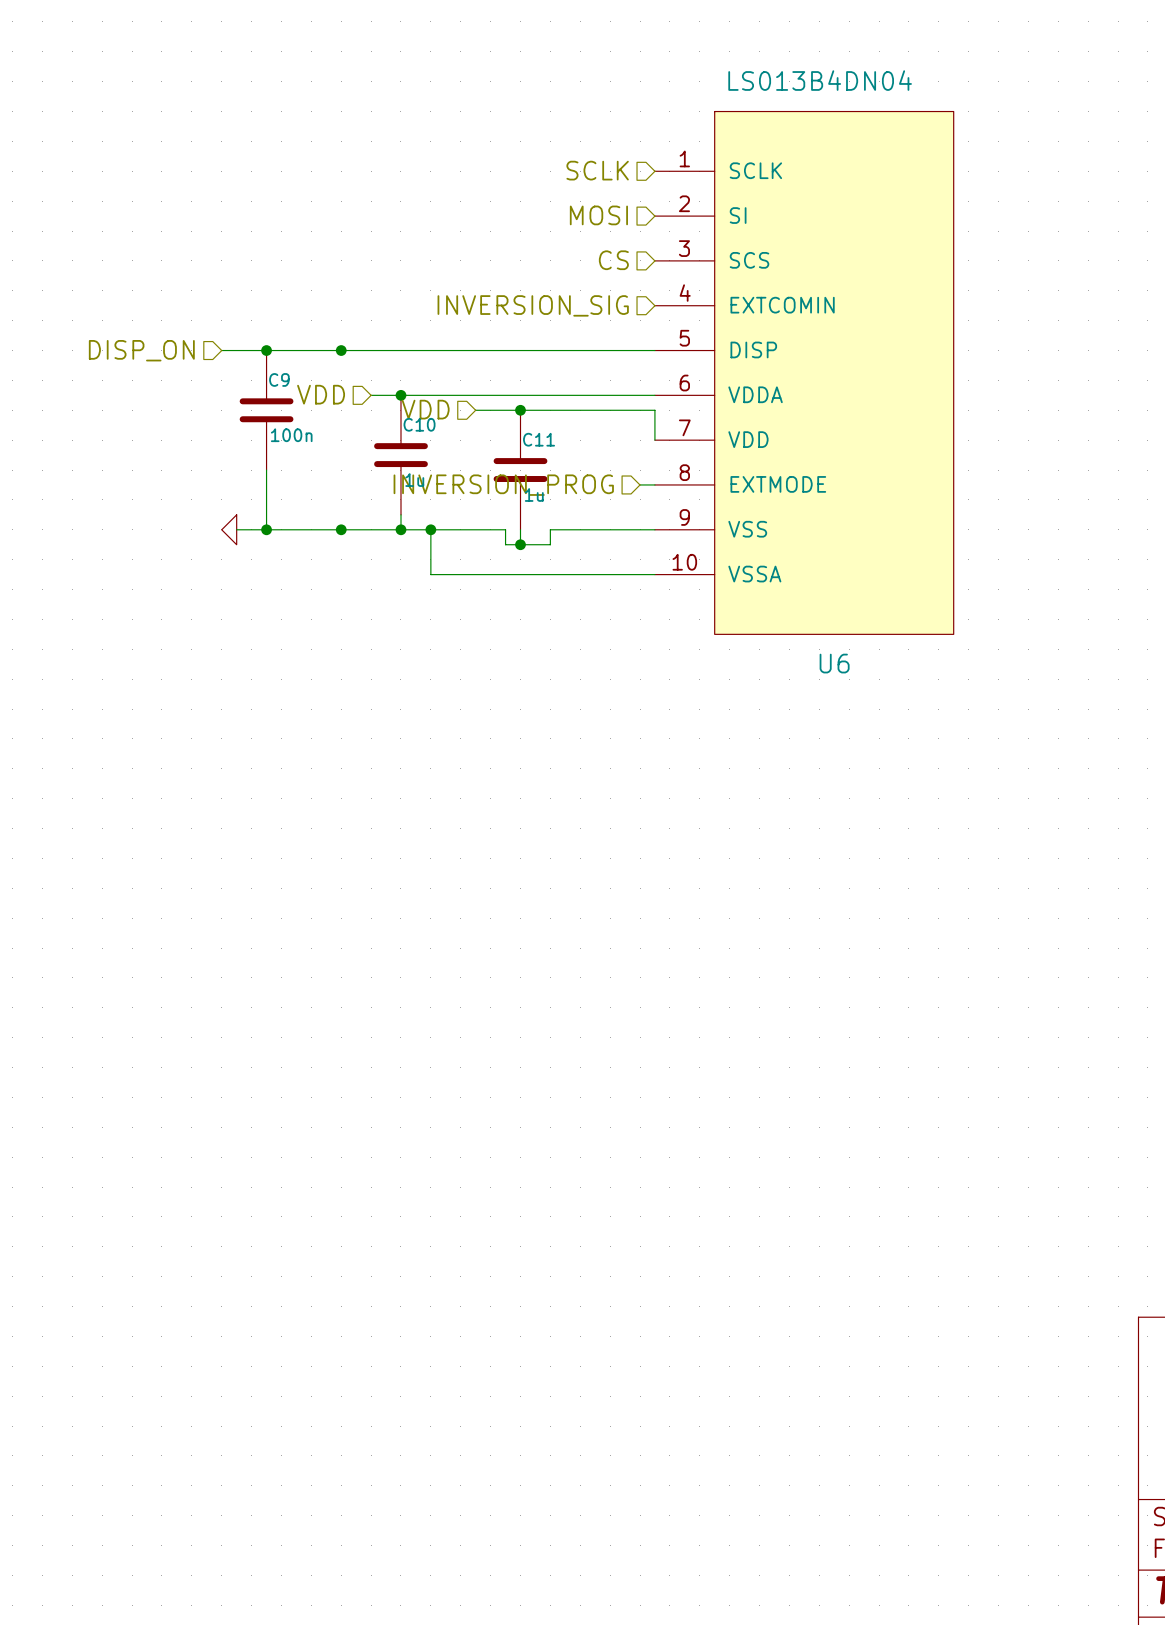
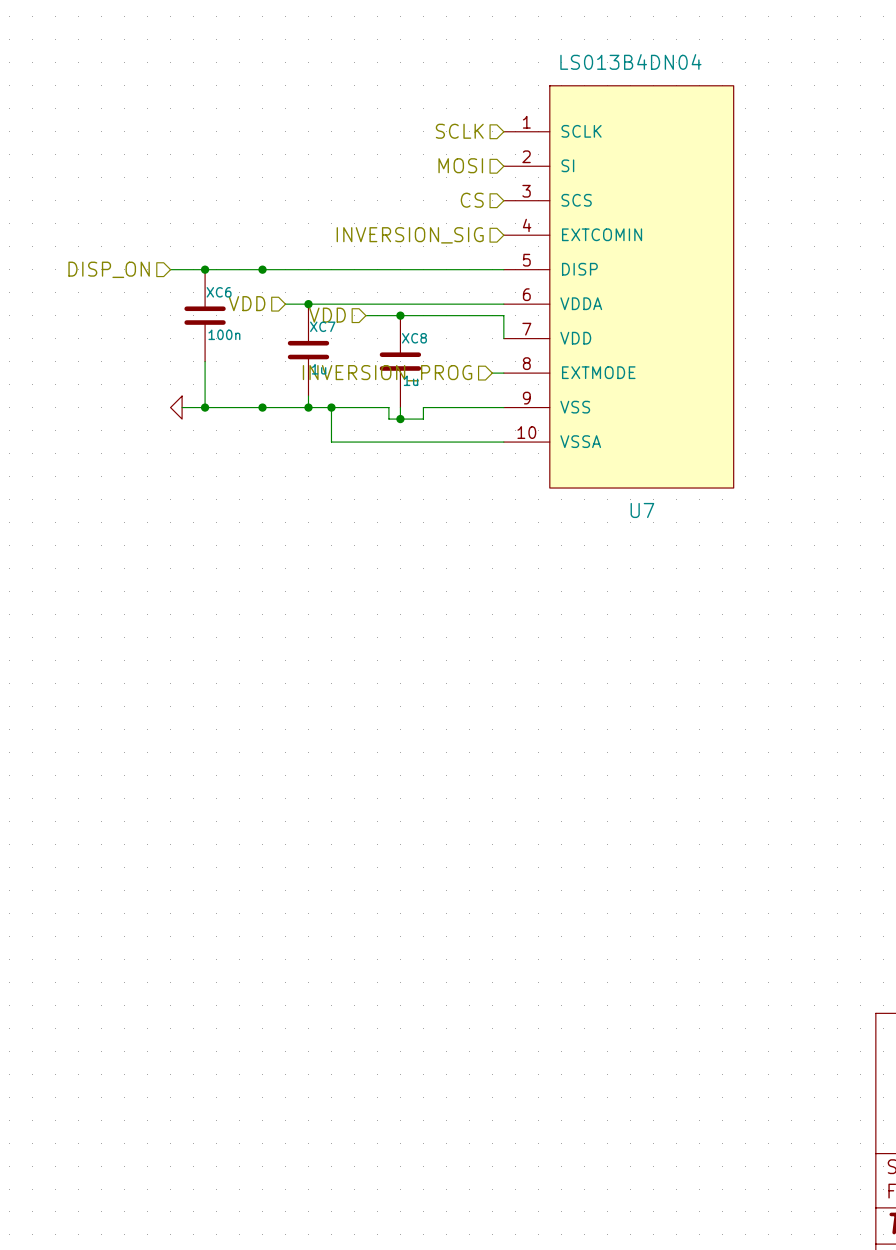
C9 name: C9 (279, 379) -> XC6 (219, 292)
C10 name: C10 (419, 424) -> XC7 (322, 326)
C11 name: C11 (539, 439) -> XC8 (414, 338)
U6 name: U6 (834, 663) -> U7 (642, 510)

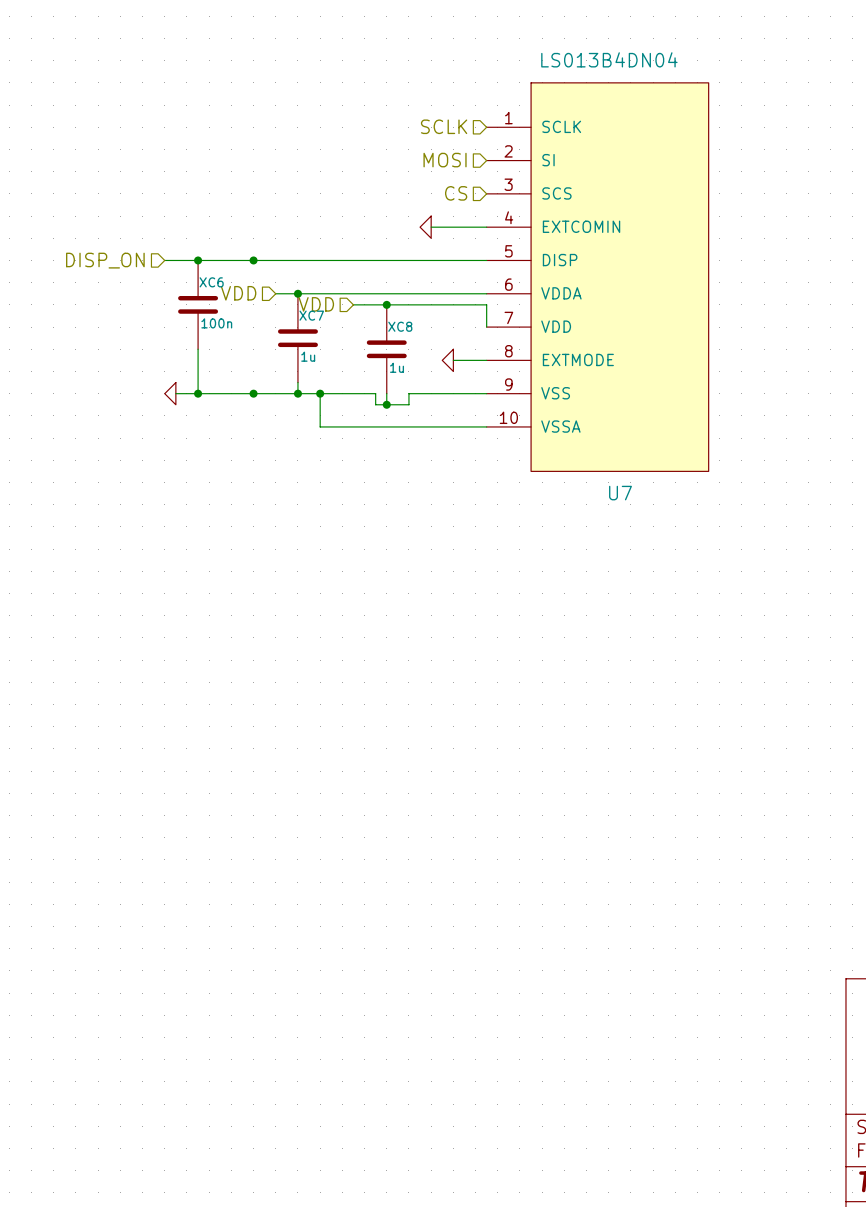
hierarchical label: INVERSION_SIG (410, 235) -> none
power symbol: none -> (425, 227)
wire: none -> (431, 227) (486, 227)
hierarchical label: INVERSION_PROG (387, 373) -> none
power symbol: none -> (447, 360)
wire: none -> (453, 360) (475, 360)

